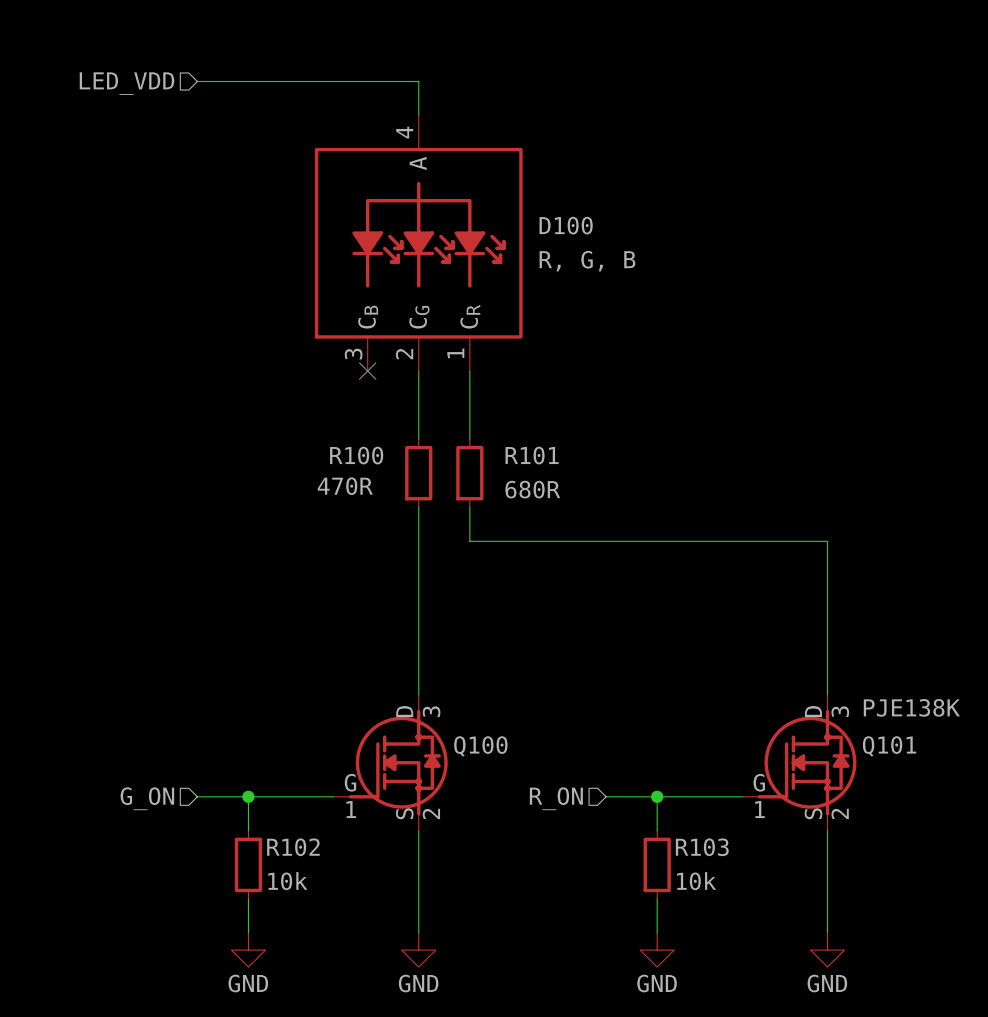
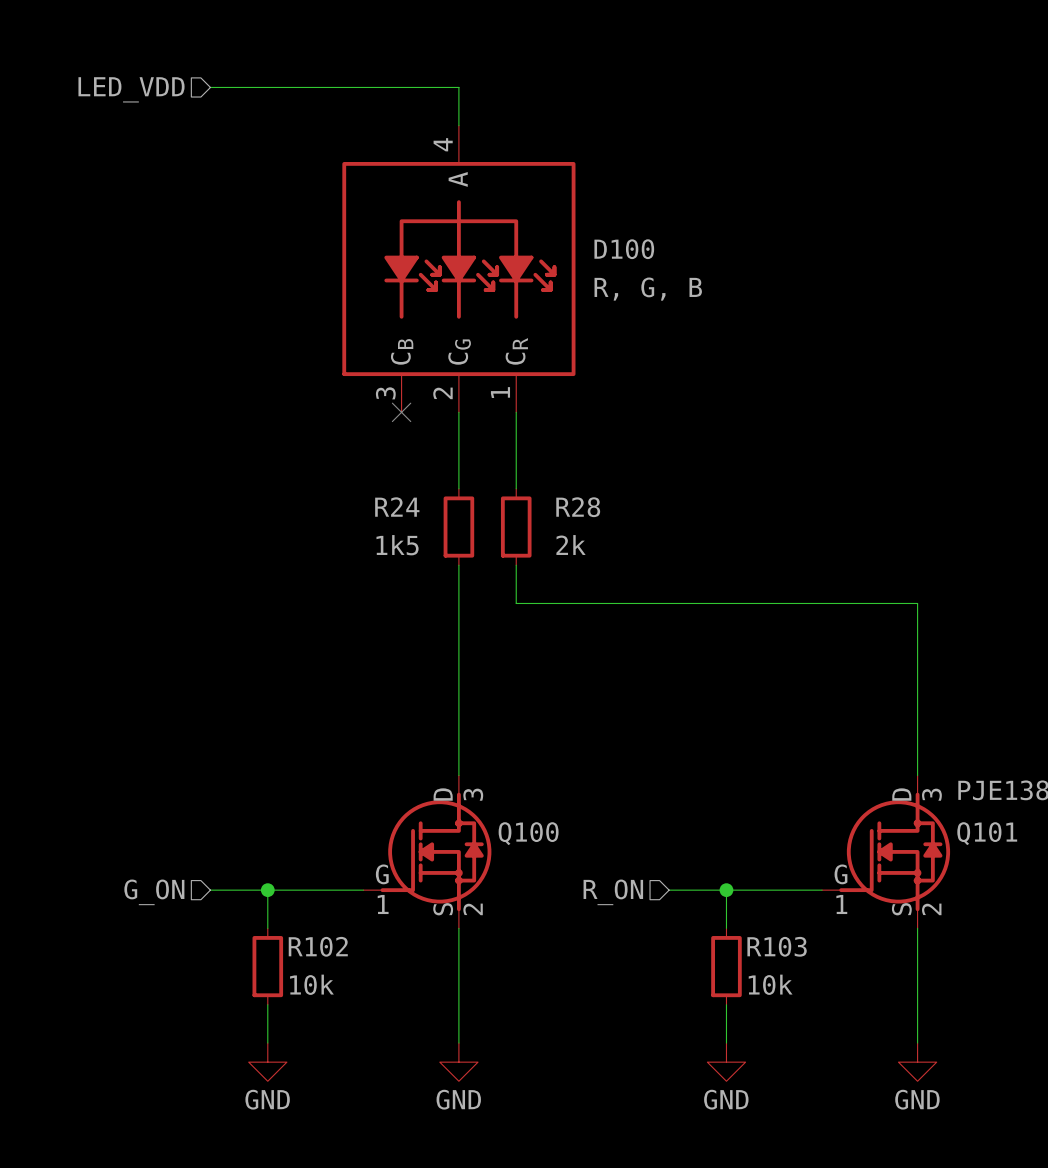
R100 name: R100 (356, 455) -> R24 (397, 507)
R101 name: R101 (532, 455) -> R28 (578, 507)
R100 text: 470R (345, 486) -> 1k5 (397, 545)
R101 text: 680R (532, 489) -> 2k (571, 545)

